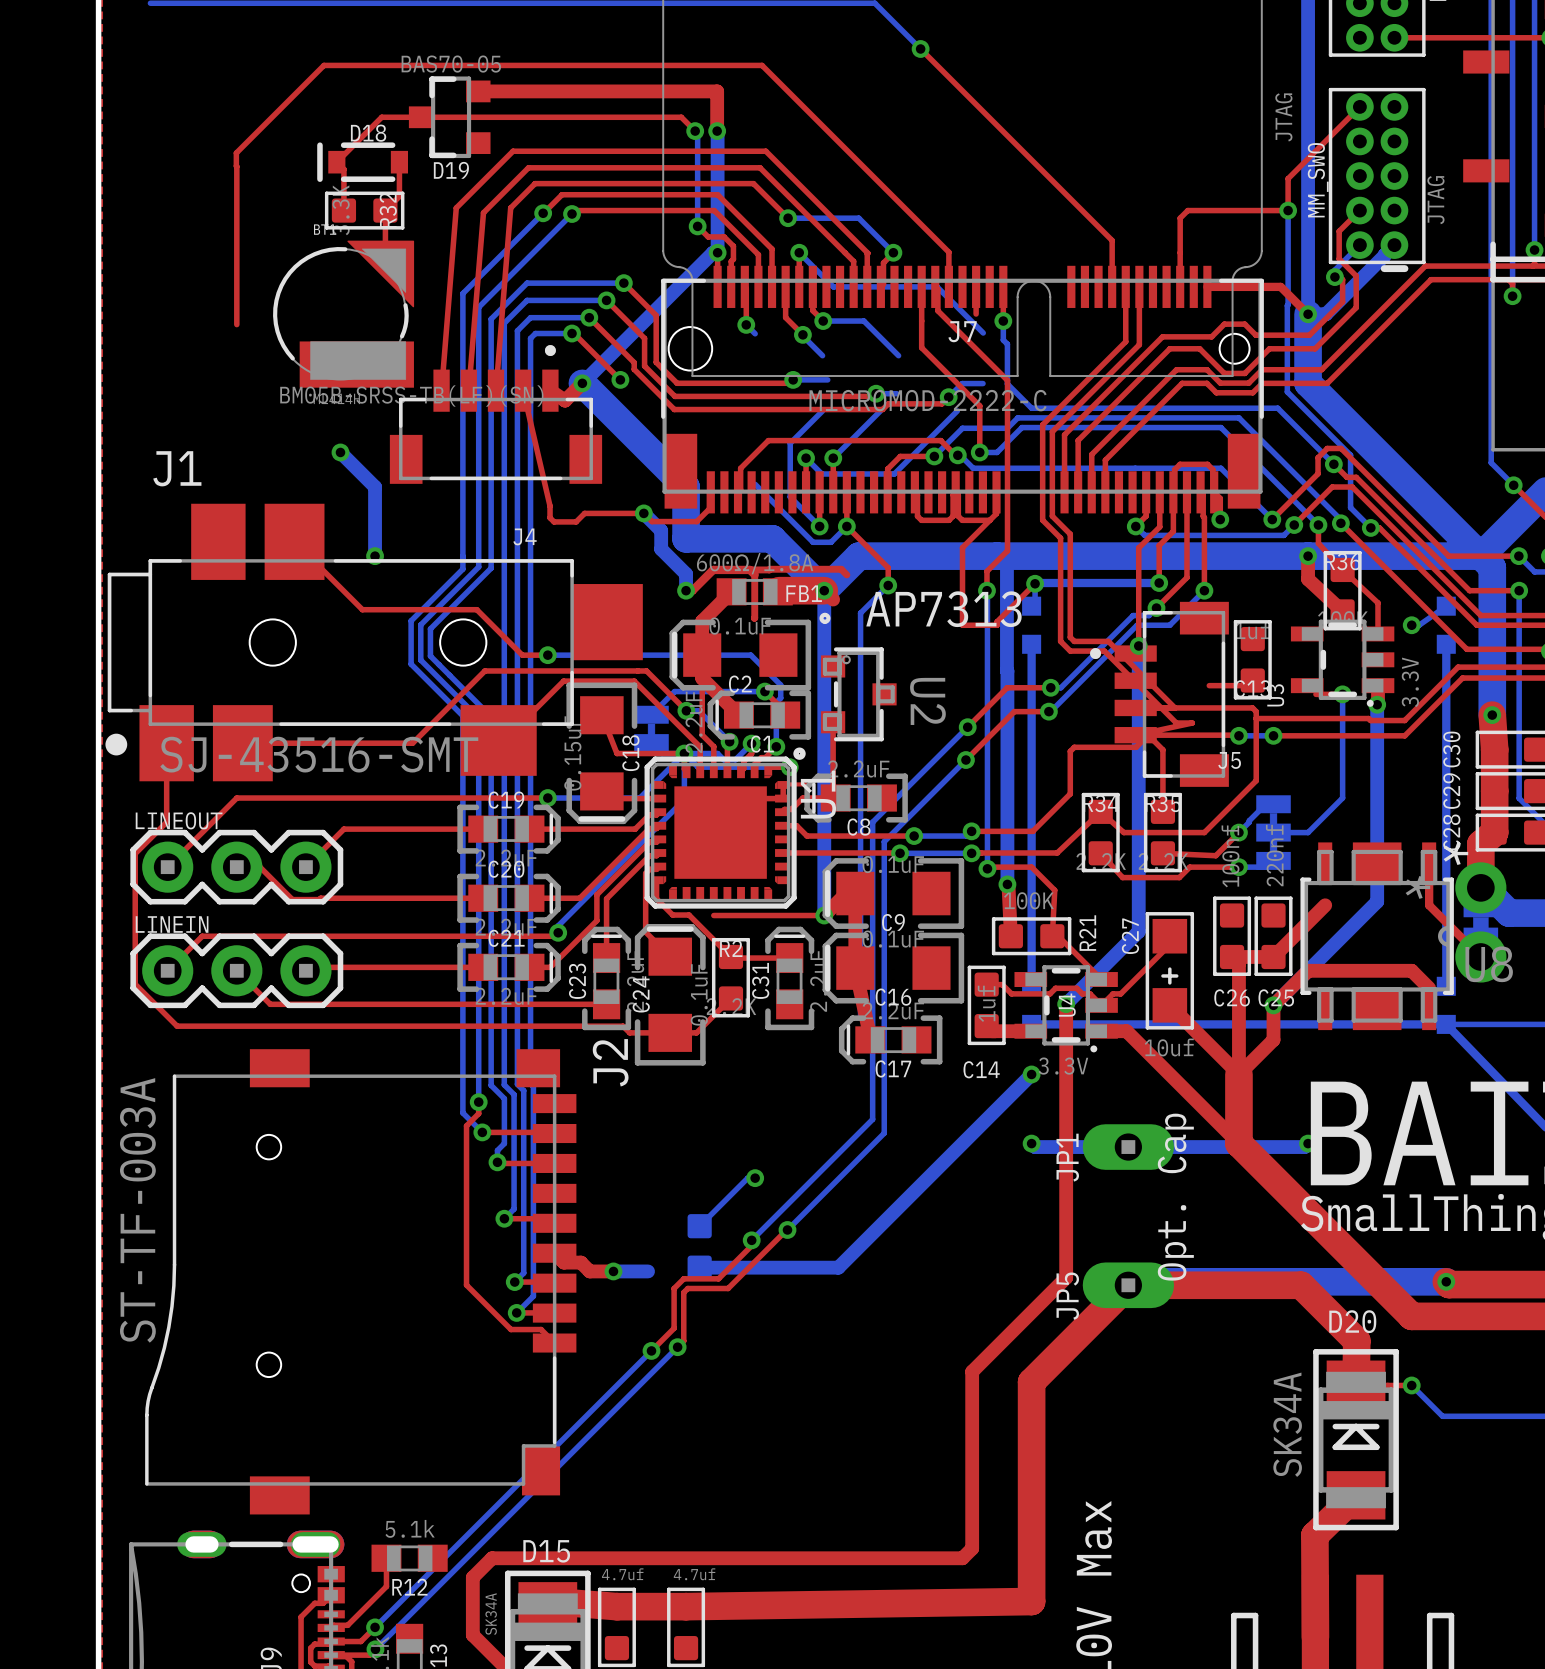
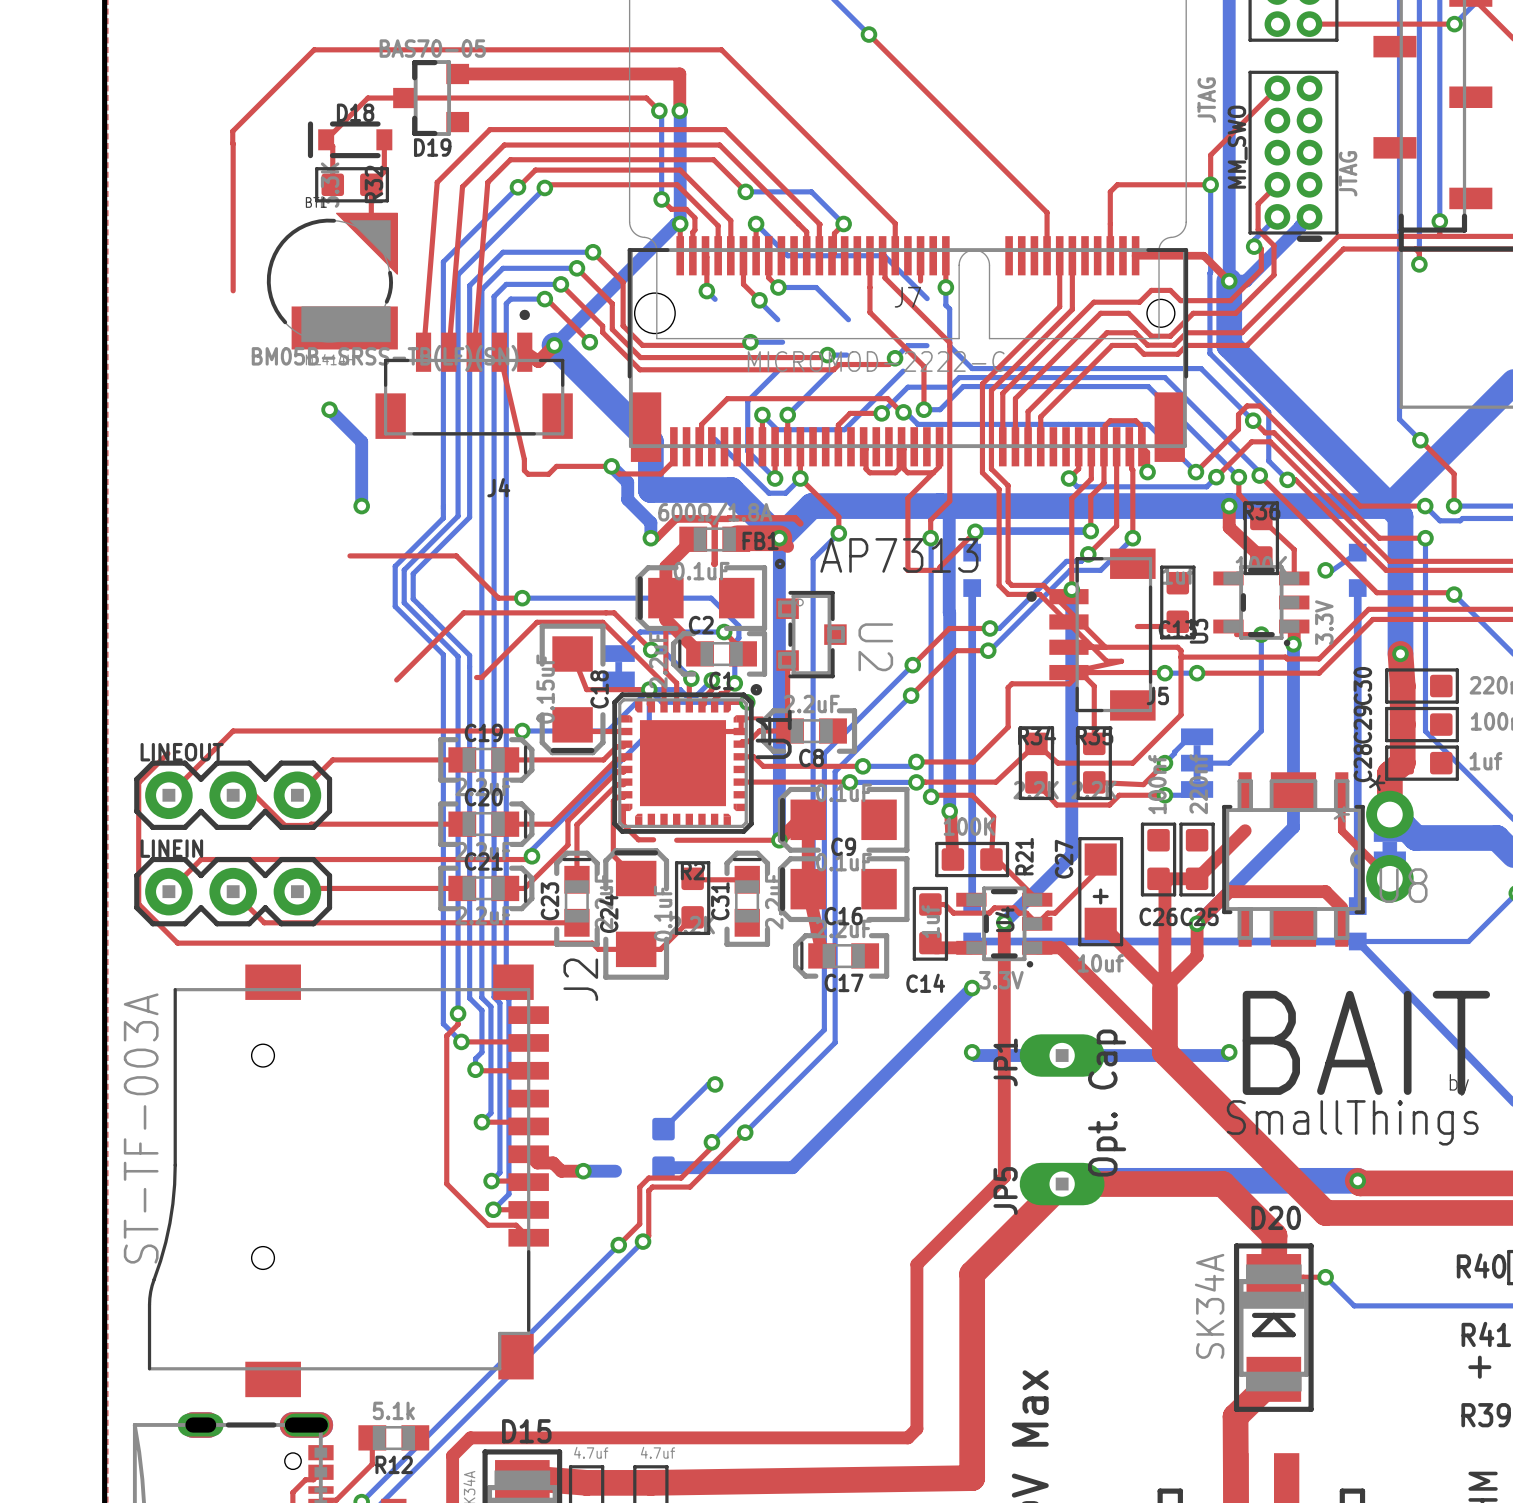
top track: (294, 541) (362, 609) -> none
J1: SJ-43516-SMT (374, 642) -> none
top track: (166, 743) (166, 822) -> none
top track: (242, 743) (412, 743) -> none
top track: (689, 915) (730, 956) -> none

